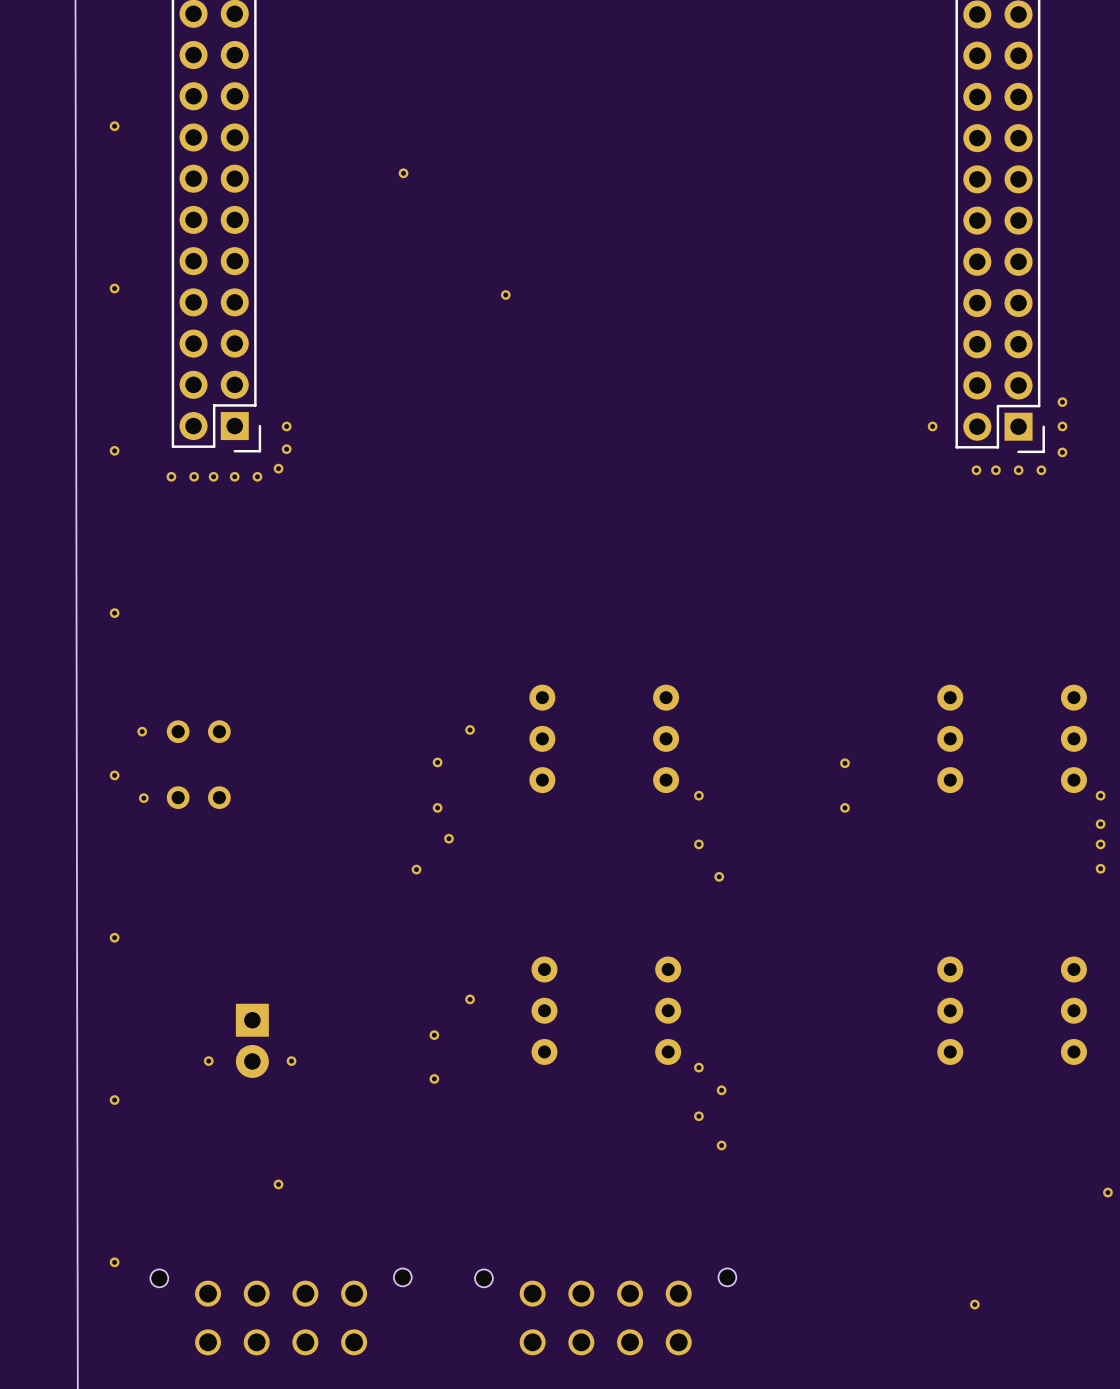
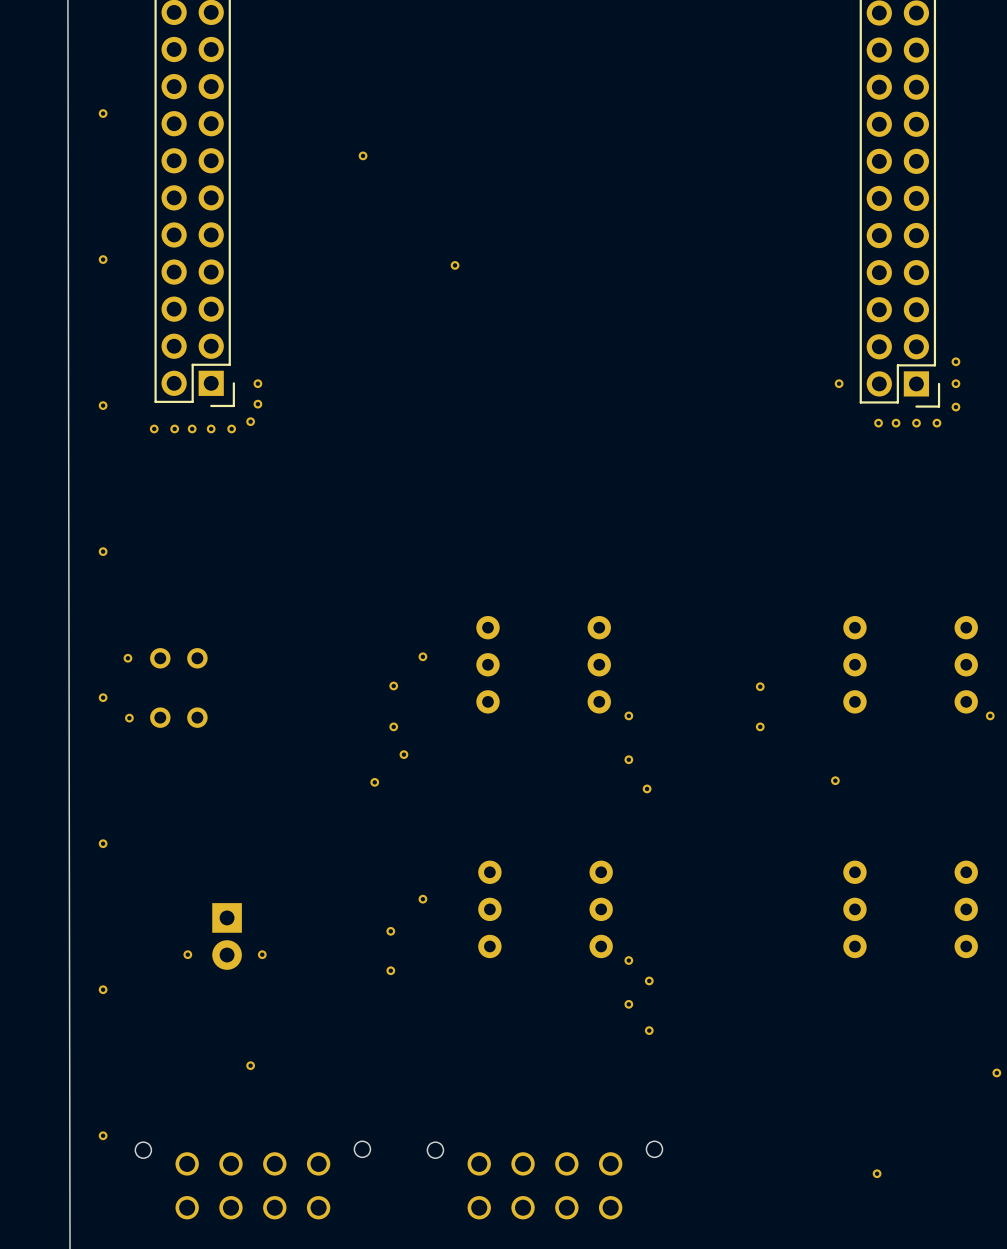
part: (1100, 824) -> none
part: (1100, 844) -> none
part: none -> (835, 780)
part: (1100, 868) -> none

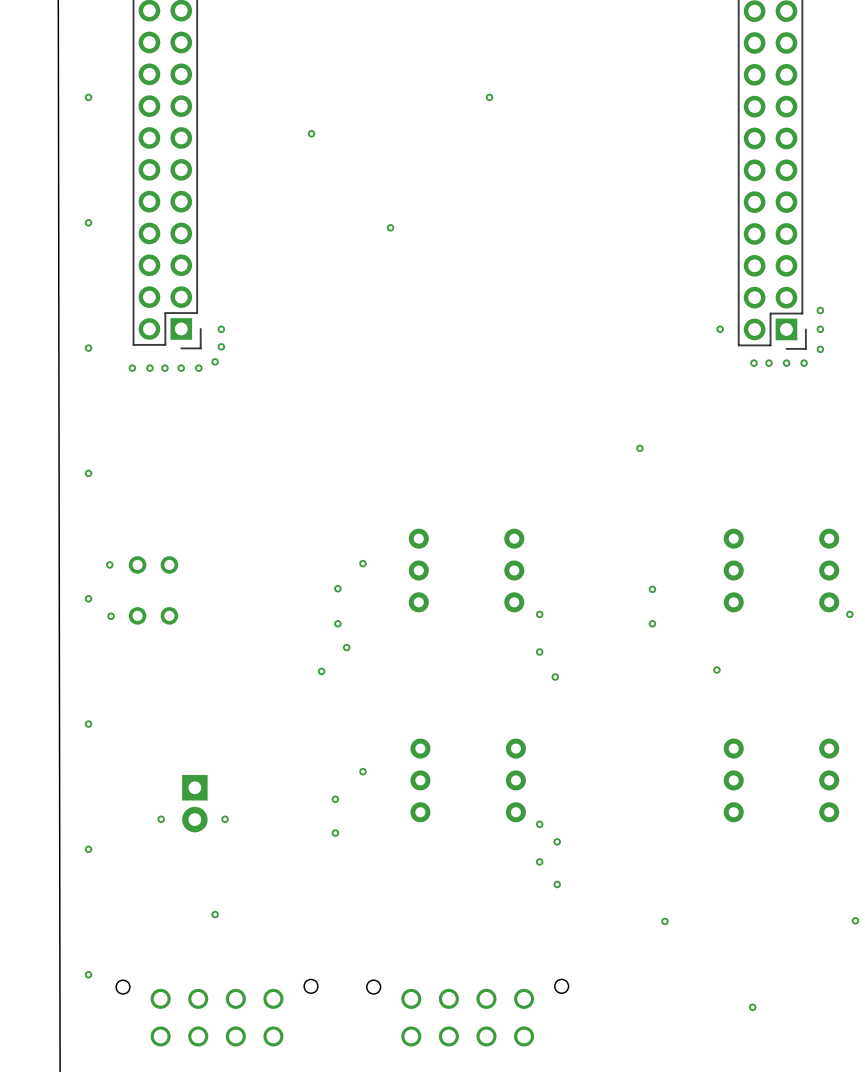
part: none -> (489, 97)
part: none -> (639, 448)
part: none -> (664, 921)

